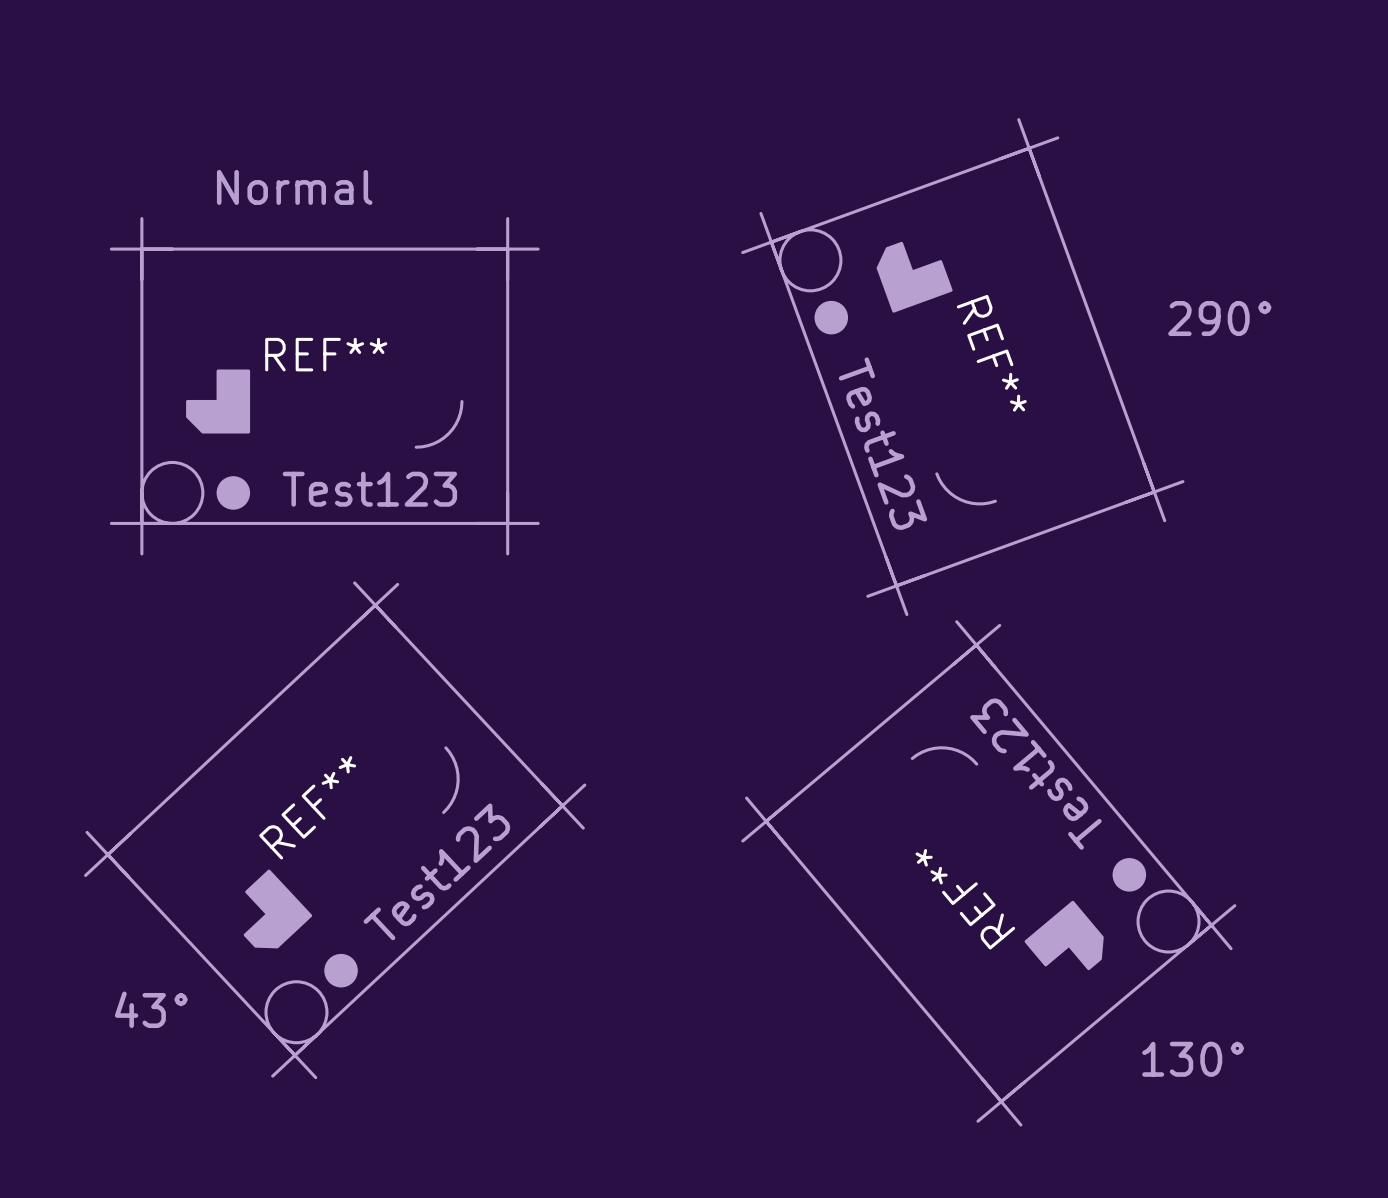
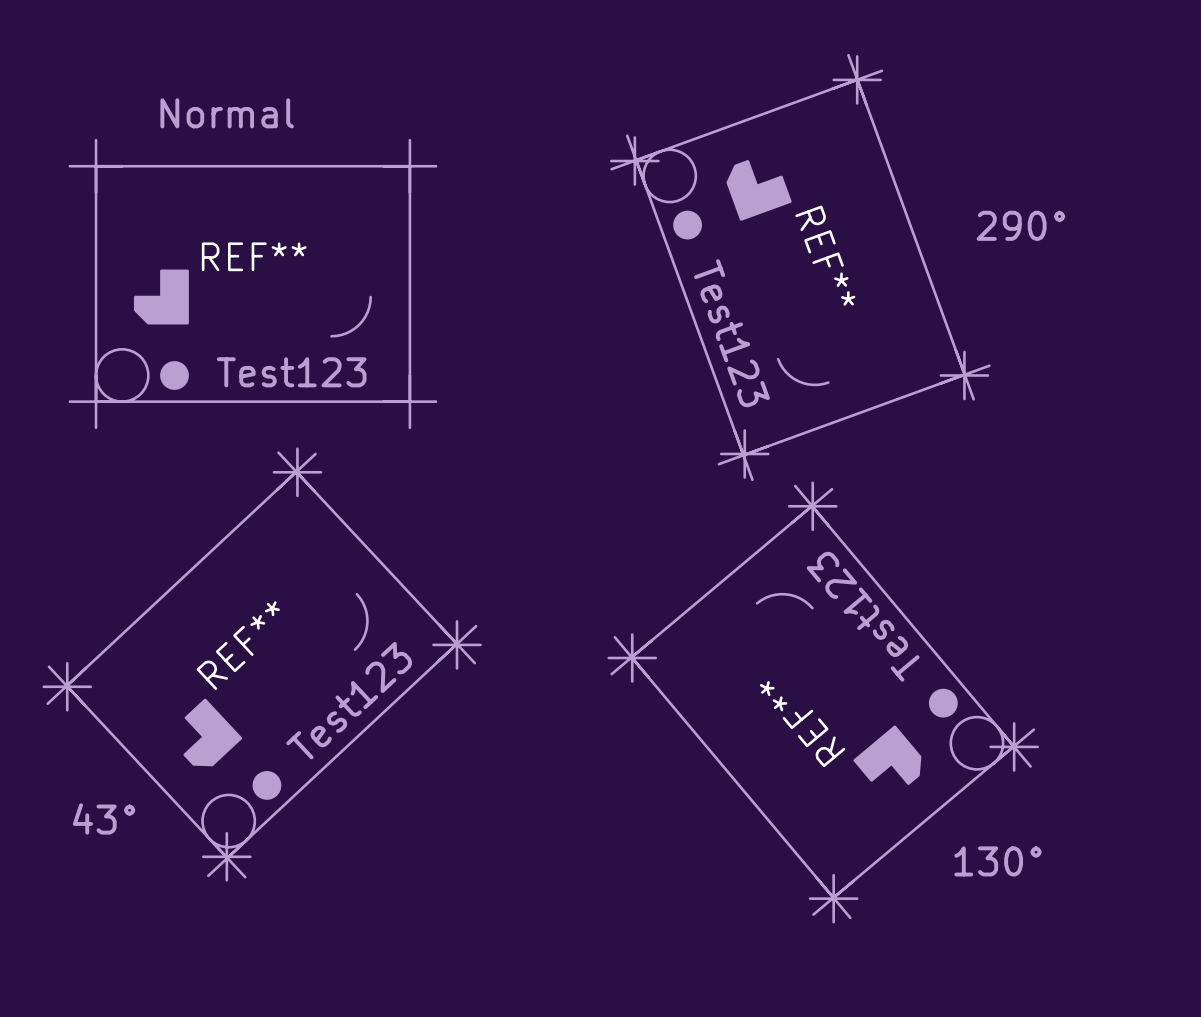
line: none -> (857, 56) (857, 103)
line: none -> (833, 79) (880, 79)
line: none -> (634, 137) (634, 184)
line: none -> (611, 161) (658, 161)
line: none -> (964, 351) (964, 399)
line: none -> (940, 375) (987, 375)
line: none -> (744, 430) (744, 477)
line: none -> (297, 448) (297, 495)
line: none -> (721, 453) (768, 453)
line: none -> (273, 472) (320, 472)
line: none -> (812, 482) (812, 529)
line: none -> (789, 506) (836, 506)
line: none -> (457, 621) (457, 668)
line: none -> (632, 634) (632, 681)
line: none -> (433, 644) (480, 644)
line: none -> (608, 657) (655, 657)
line: none -> (67, 663) (67, 710)
line: none -> (43, 686) (90, 686)
line: none -> (1014, 723) (1014, 770)
line: none -> (990, 746) (1037, 746)
line: none -> (226, 833) (226, 880)
line: none -> (203, 856) (250, 856)
line: none -> (833, 875) (833, 922)
line: none -> (810, 898) (857, 898)

